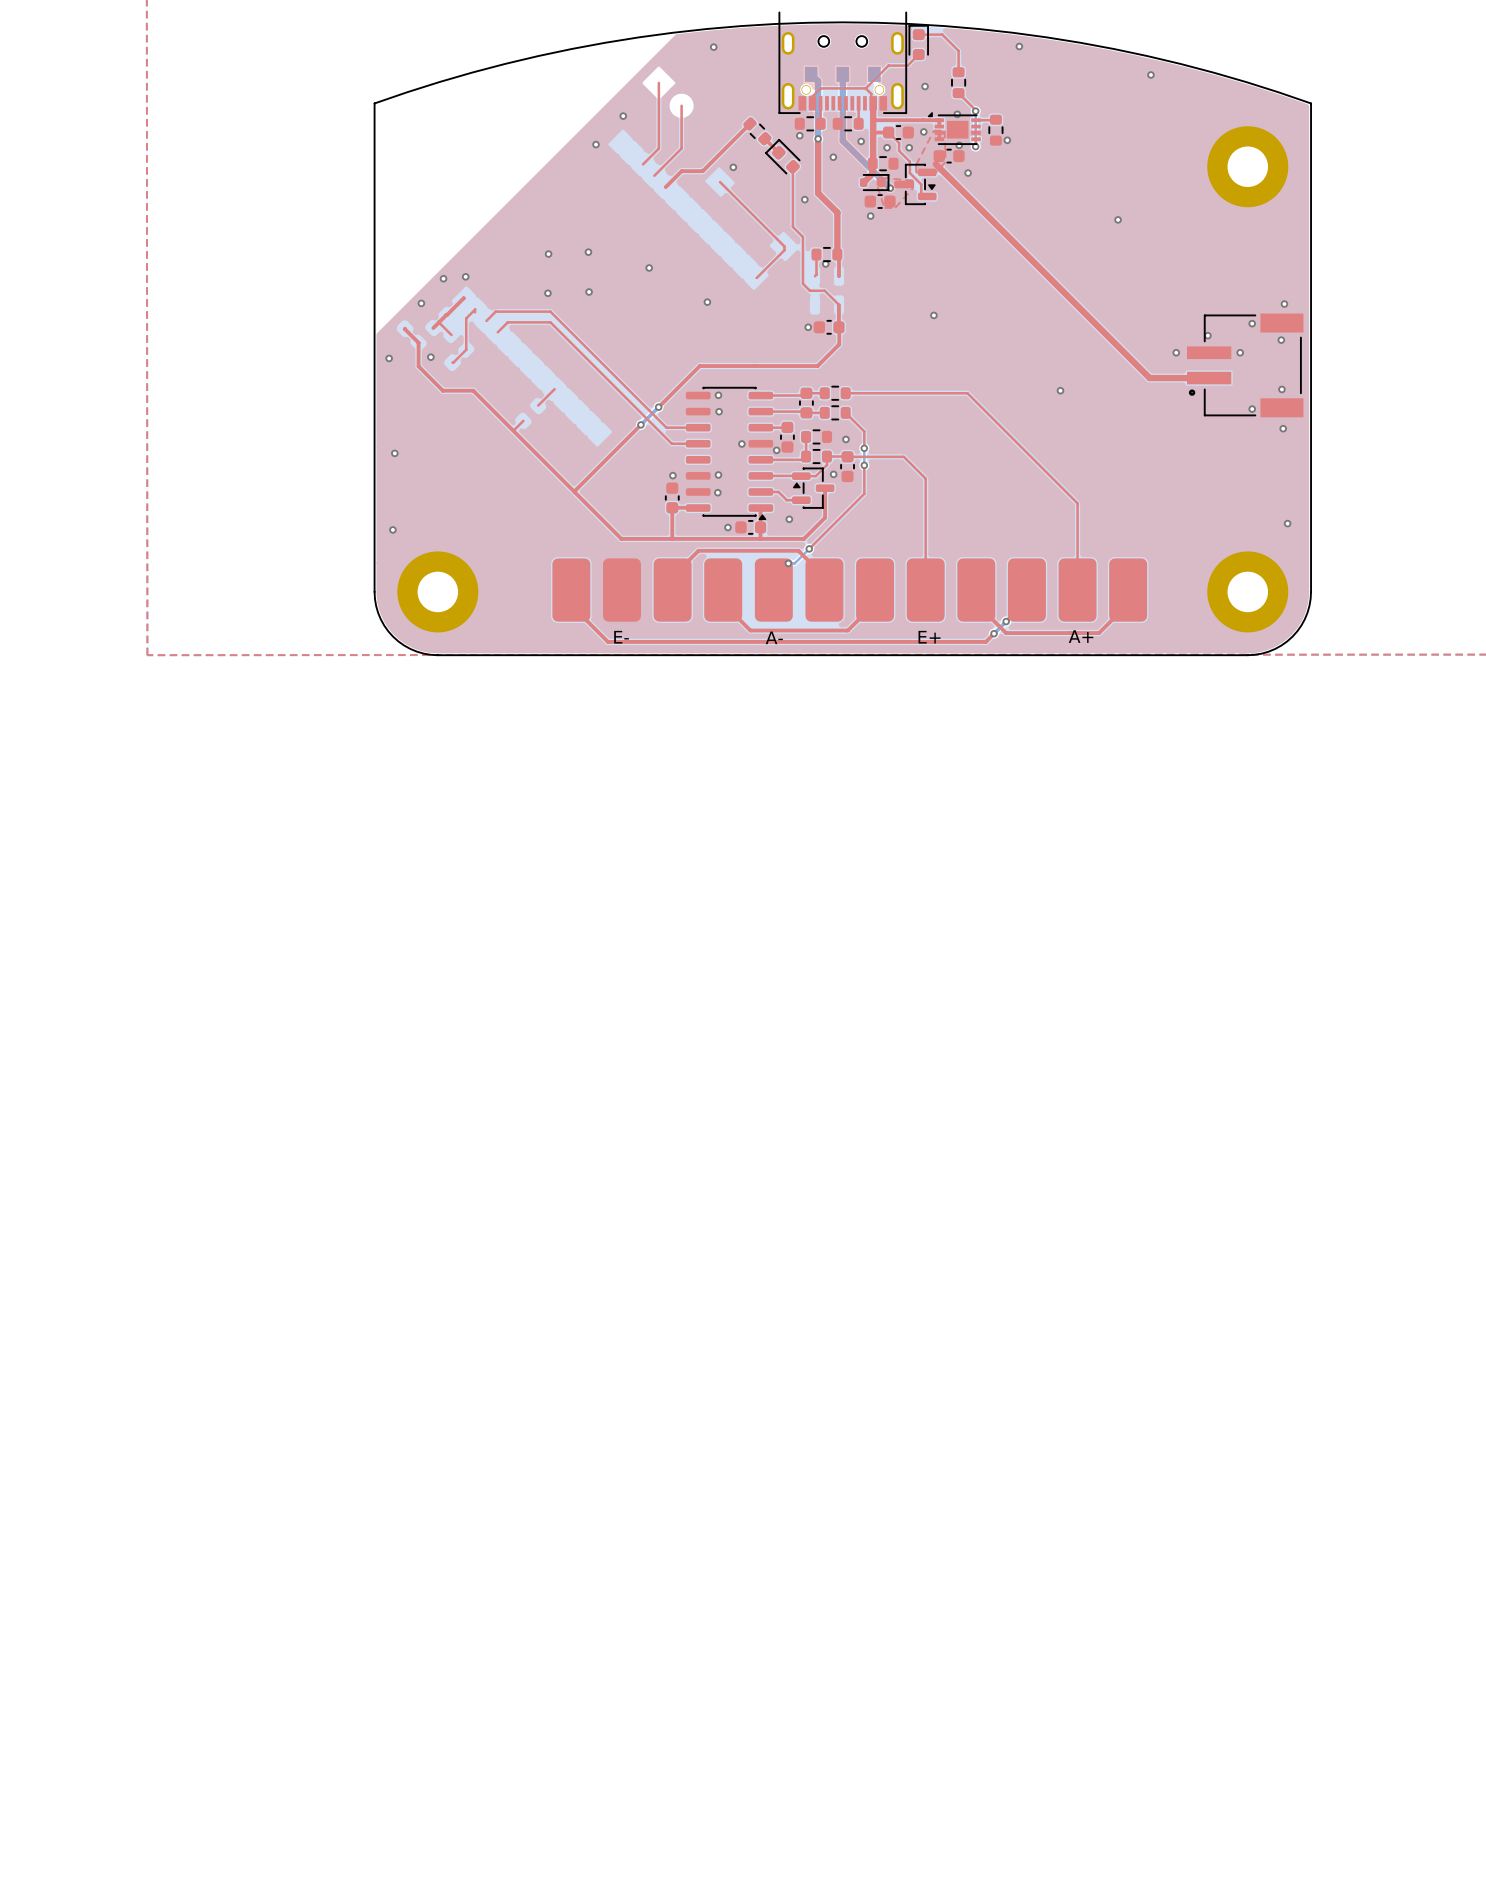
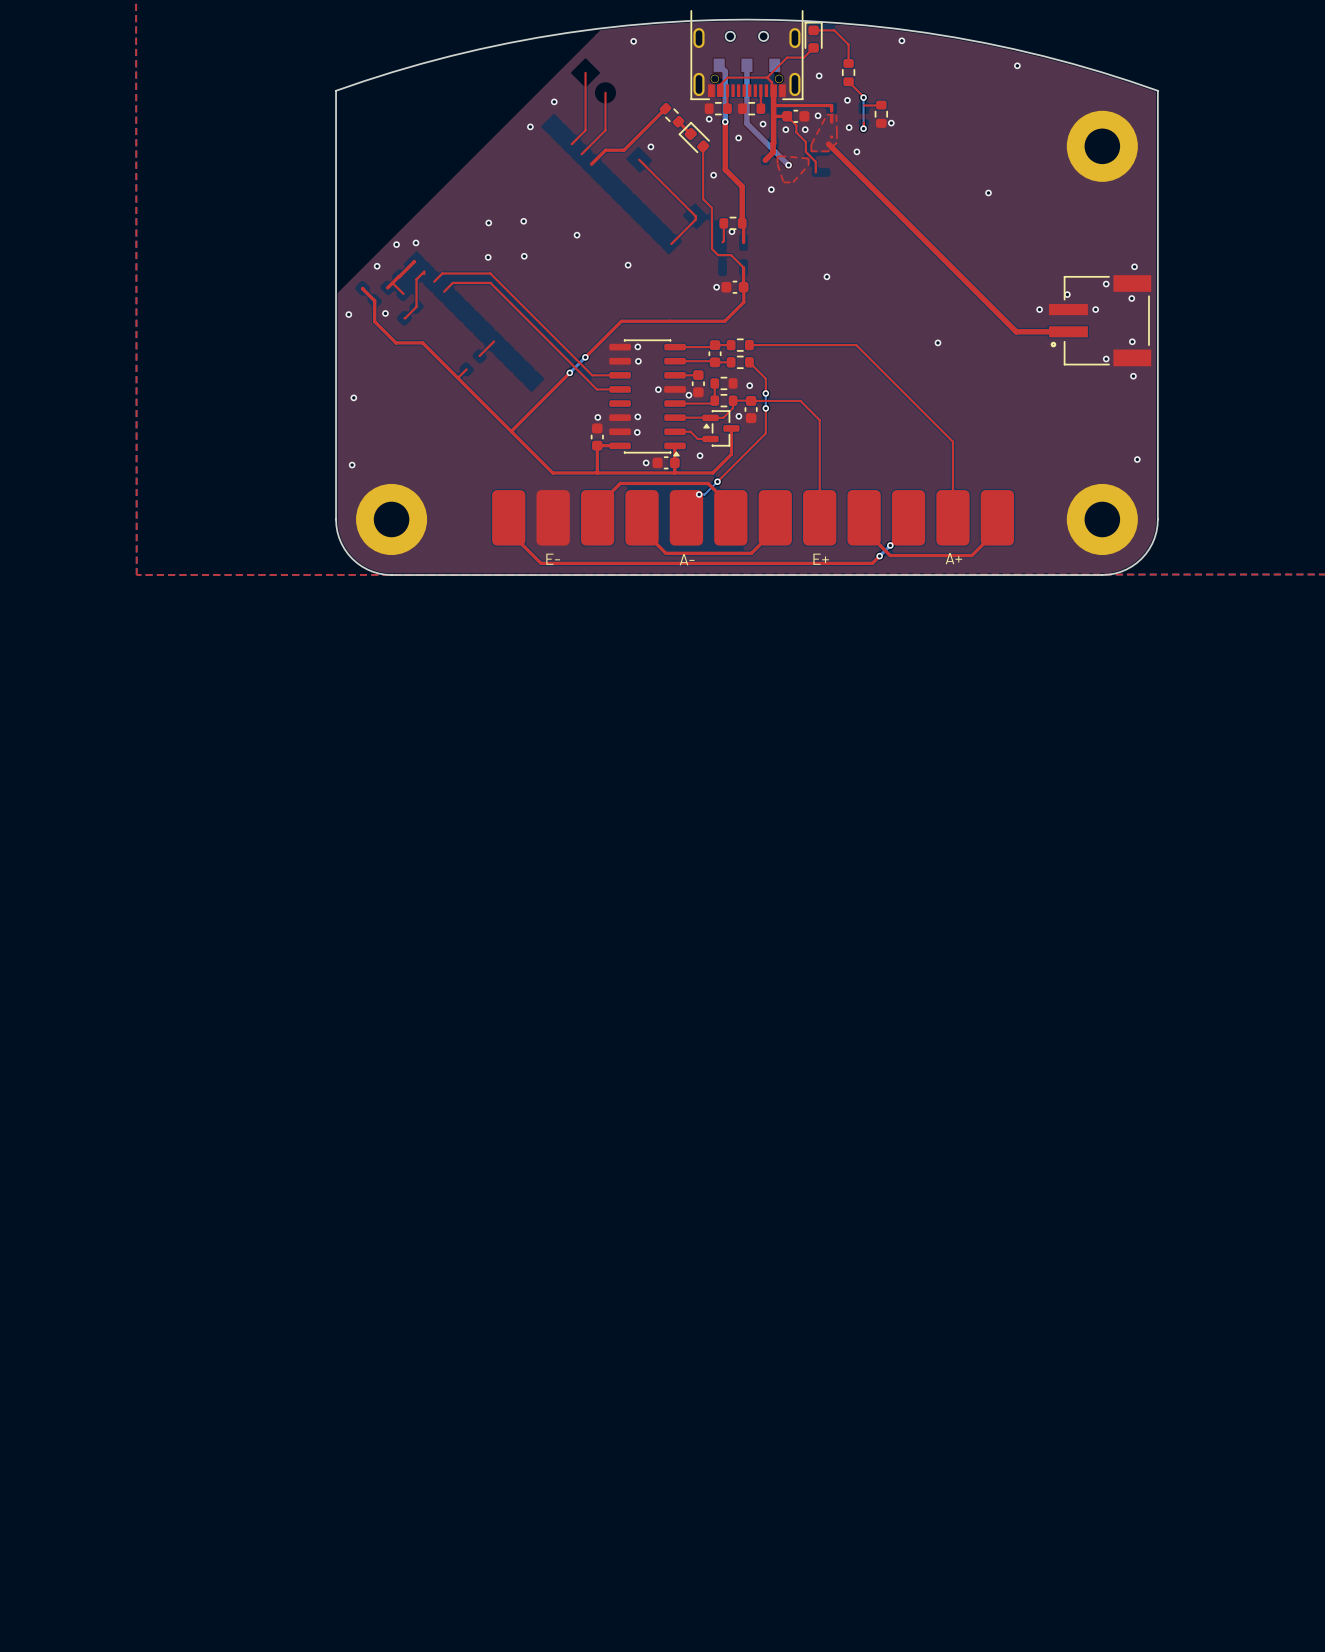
part: (954, 128) -> none
part: (949, 156) -> none
part: (883, 163) -> none
part: (874, 182) -> none
part: (915, 184) -> none
part: (880, 201) -> none

